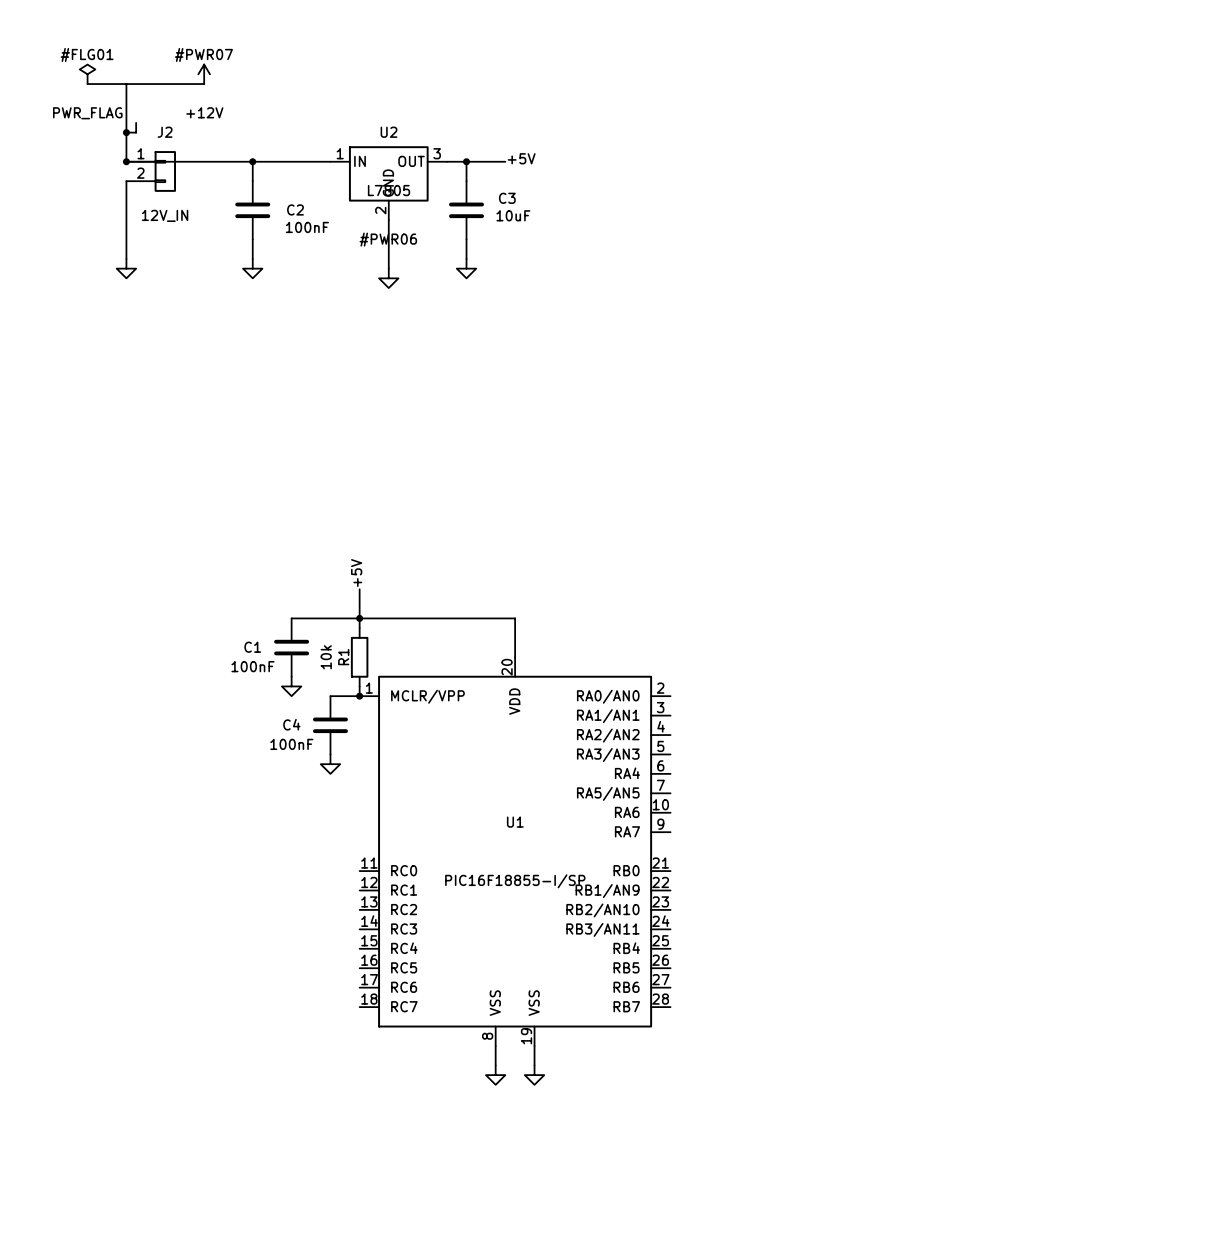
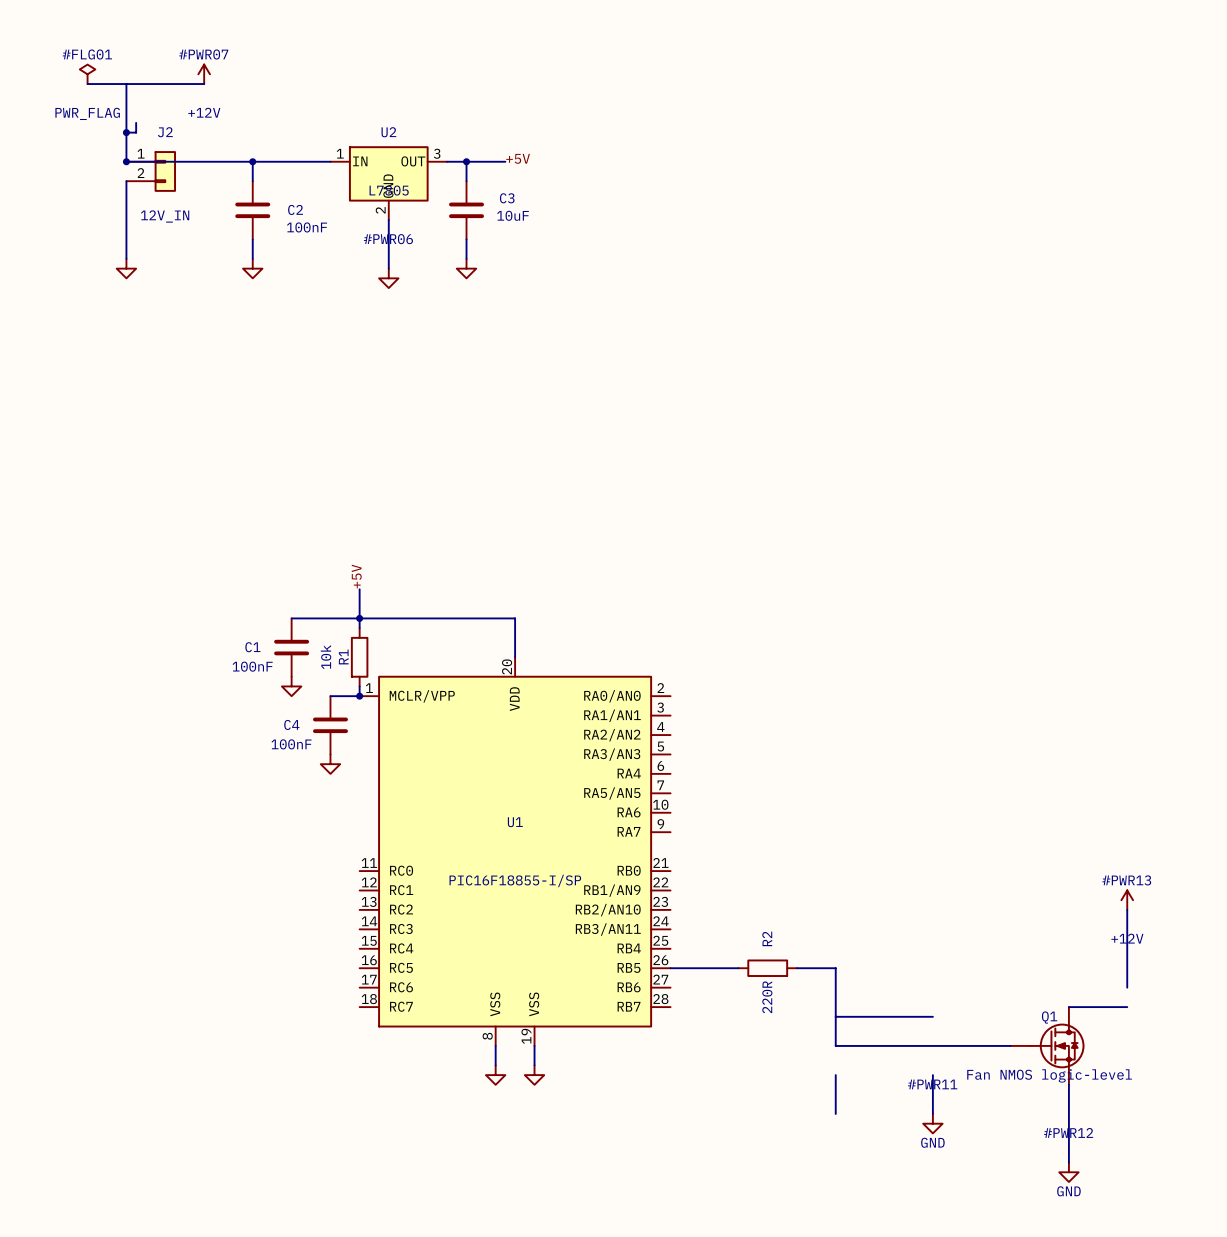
#PWR13: none -> +12V (1127, 900)
wire: none -> (1127, 909) (1127, 987)
wire: none -> (670, 968) (738, 968)
R2: none -> 220R (767, 968)
wire: none -> (796, 968) (835, 968) (835, 1045) (1010, 1045)
wire: none -> (1068, 1007) (1127, 1007)
wire: none -> (835, 1016) (932, 1016)
Q1: none -> Fan NMOS logic-level (1047, 1045)
wire: none -> (835, 1075) (835, 1113)
wire: none -> (932, 1075) (932, 1113)
wire: none -> (1068, 1084) (1068, 1162)
#PWR11: none -> GND (932, 1123)
#PWR12: none -> GND (1068, 1172)

